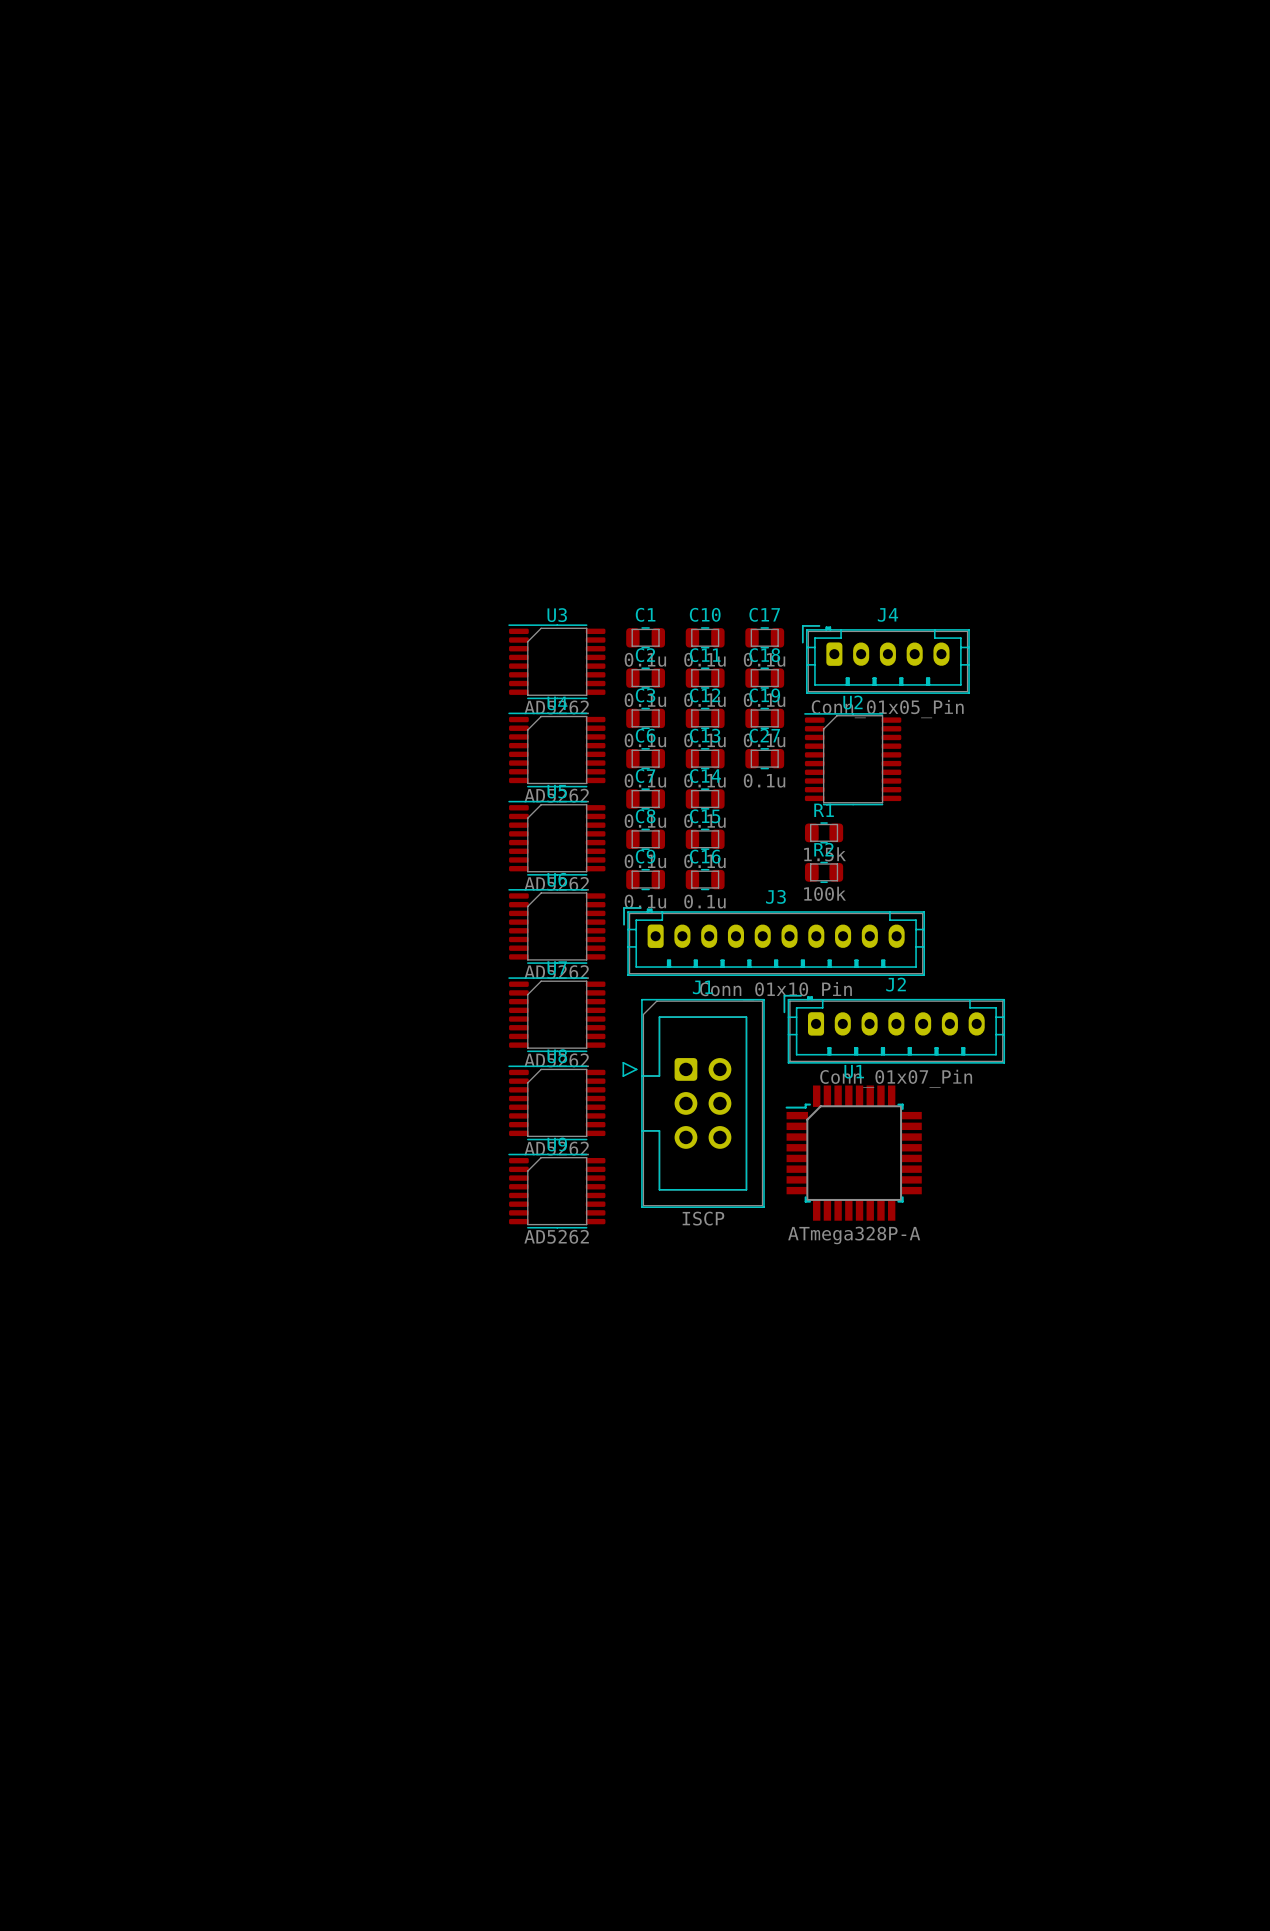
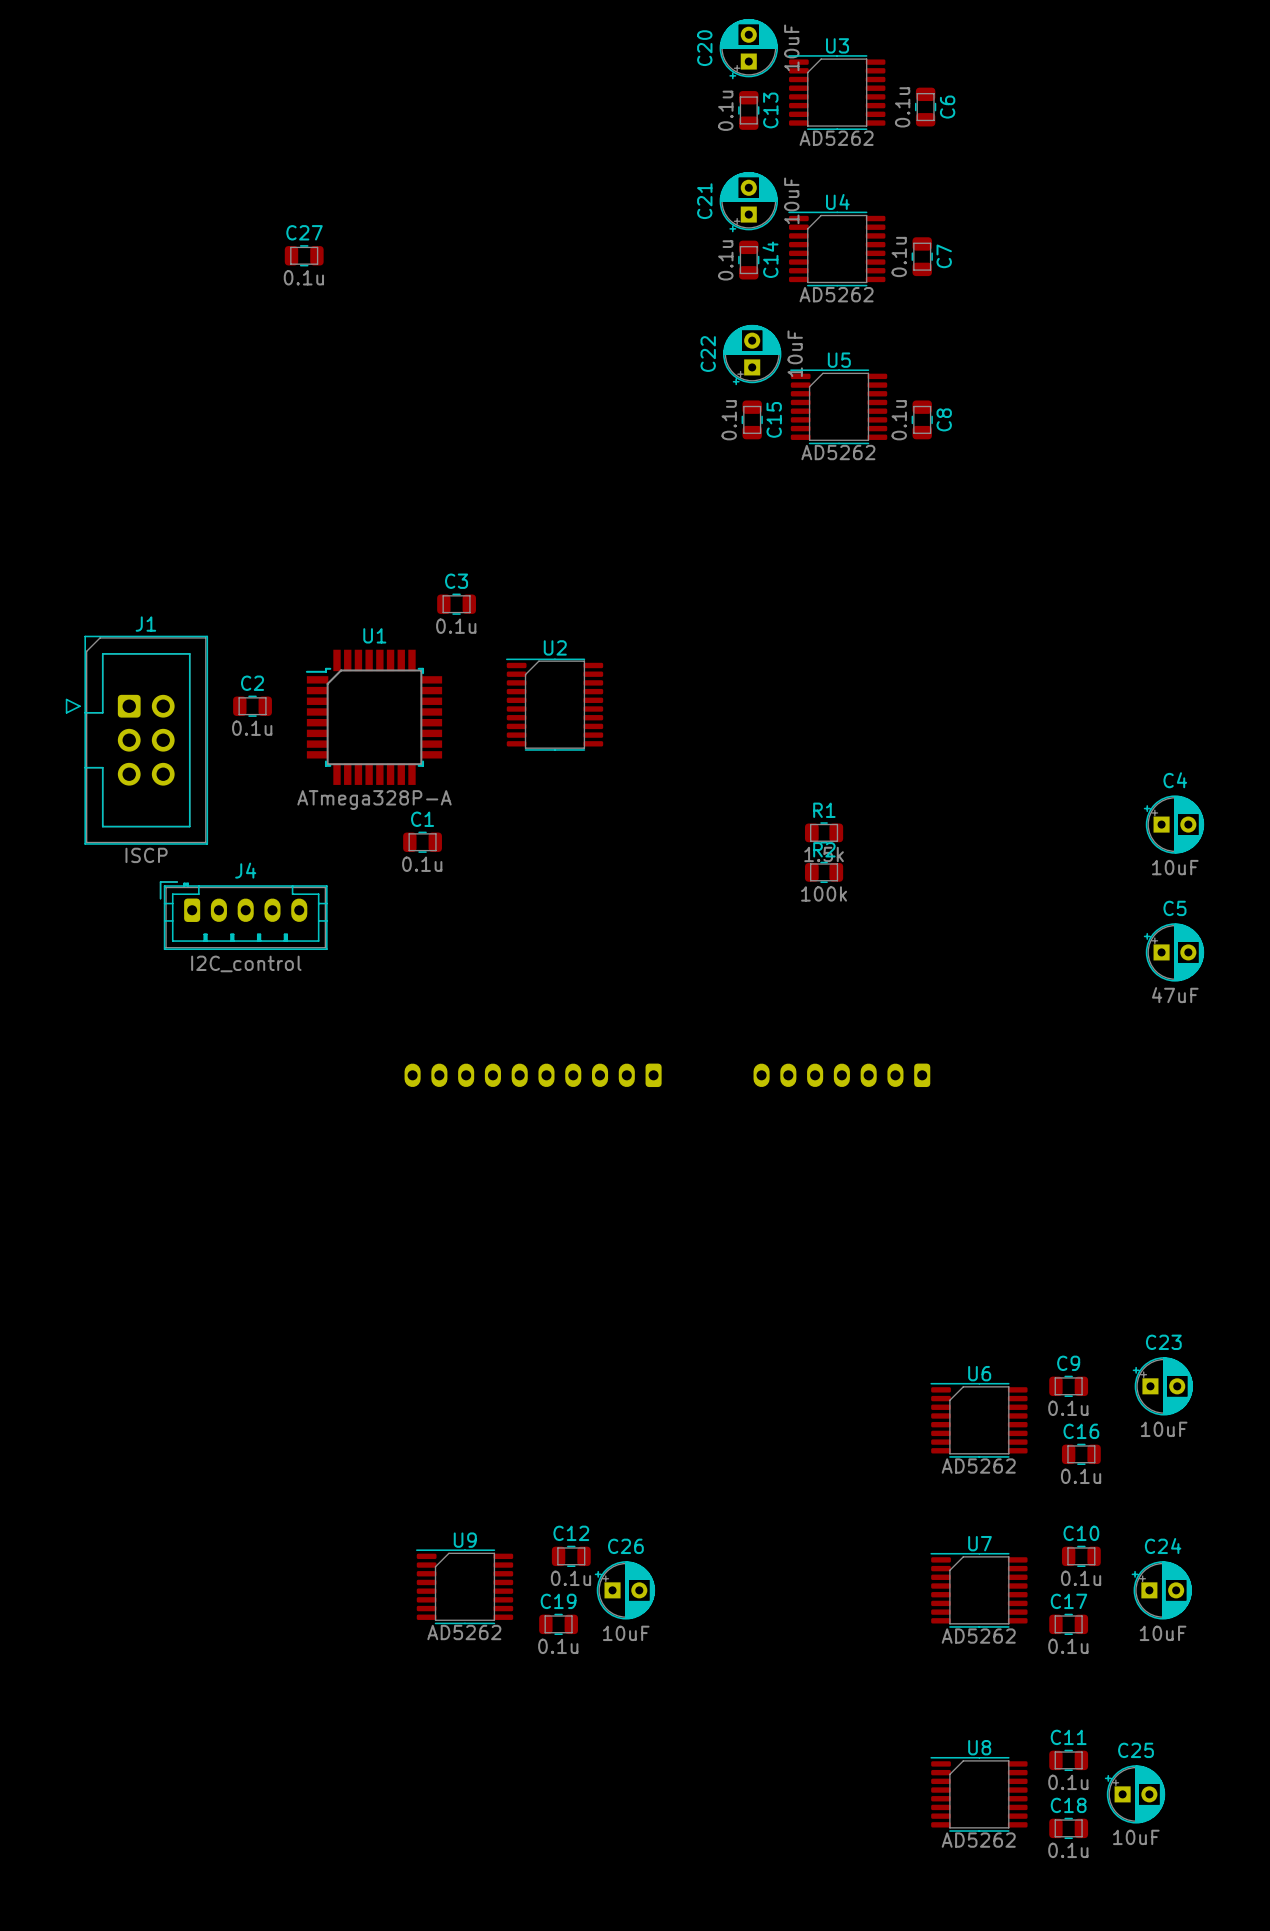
C20: none -> 10uF (748, 49)
C21: none -> 10uF (748, 202)
C22: none -> 10uF (752, 355)
C1 position: (645, 637) -> (422, 842)
C10 position: (705, 637) -> (1081, 1556)
C17 position: (764, 637) -> (1068, 1624)
J4 position: (885, 659) -> (243, 915)
U3 position: (556, 661) -> (836, 92)
C2 position: (645, 678) -> (252, 706)
C11 position: (705, 678) -> (1068, 1760)
C18 position: (764, 678) -> (1068, 1828)
J4 value: Conn_01x05_Pin (887, 709) -> I2C_control (246, 963)
C3 position: (645, 718) -> (456, 604)
C12 position: (705, 718) -> (571, 1556)
C19 position: (764, 718) -> (558, 1624)
U4 position: (556, 750) -> (836, 248)
C6 rotation: 0° (645, 758) -> 90° clockwise (925, 107)
C6 position: (645, 758) -> (925, 107)
C13 rotation: 0° (705, 758) -> 90° clockwise (748, 110)
C13 position: (705, 758) -> (748, 110)
C27 position: (764, 758) -> (304, 255)
U2 position: (852, 759) -> (554, 704)
C7 rotation: 0° (645, 799) -> 90° clockwise (922, 256)
C7 position: (645, 799) -> (922, 256)
C14 rotation: 0° (705, 799) -> 90° clockwise (748, 260)
C14 position: (705, 799) -> (748, 260)
C4: none -> 10uF (1173, 824)
U5 position: (556, 838) -> (838, 406)
C8 rotation: 0° (645, 839) -> 90° clockwise (922, 419)
C8 position: (645, 839) -> (922, 419)
C15 rotation: 0° (705, 839) -> 90° clockwise (752, 419)
C15 position: (705, 839) -> (752, 419)
C9 position: (645, 879) -> (1068, 1386)
C16 position: (705, 879) -> (1081, 1454)
U6 position: (556, 926) -> (978, 1420)
J3 side: top (774, 941) -> bottom (533, 1075)
C5: none -> 47uF (1173, 952)
U7 position: (556, 1014) -> (978, 1590)
J2 side: top (894, 1029) -> bottom (841, 1075)
U8 position: (556, 1102) -> (978, 1794)
J1 position: (693, 1103) -> (136, 740)
U1 position: (853, 1153) -> (373, 717)
U9 position: (556, 1191) -> (464, 1586)
C23: none -> 10uF (1162, 1386)
C26: none -> 10uF (624, 1590)
C24: none -> 10uF (1161, 1590)
C25: none -> 10uF (1134, 1794)

